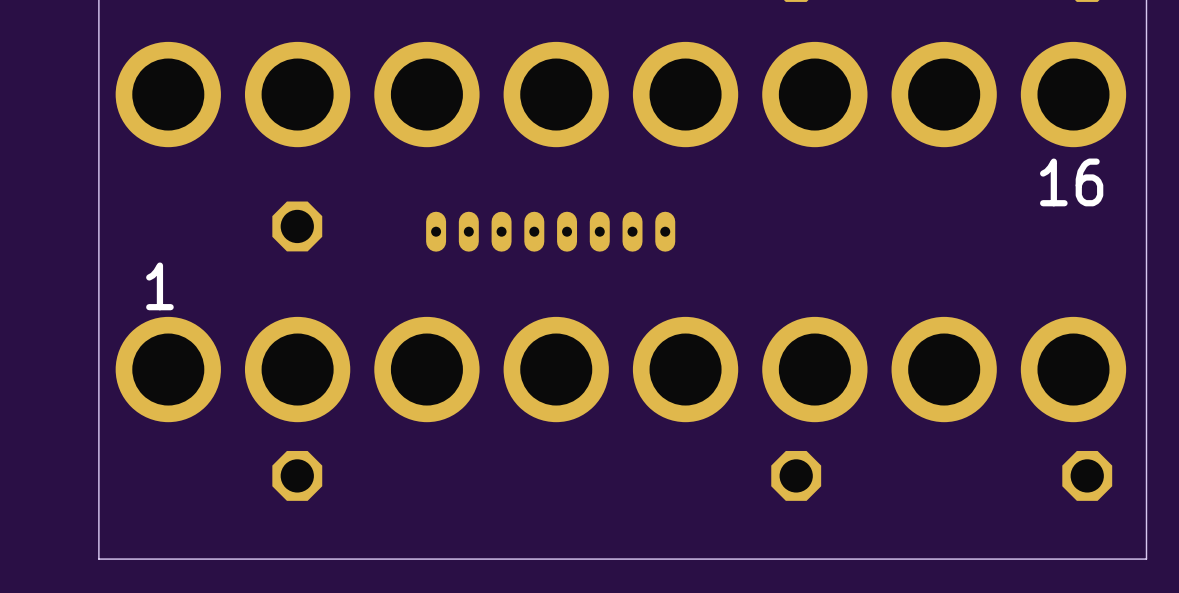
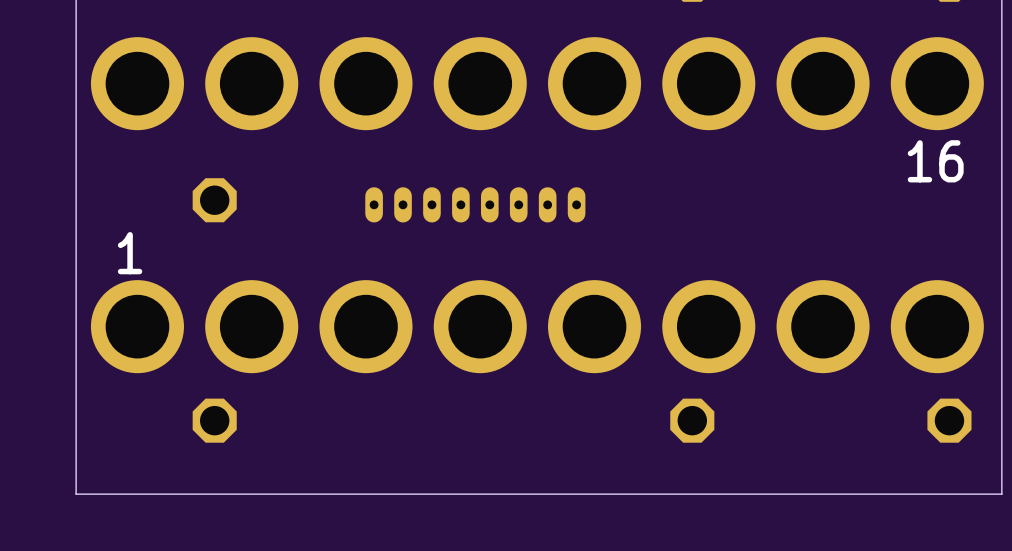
part position: (297, 226) -> (214, 200)
part position: (297, 475) -> (214, 420)

